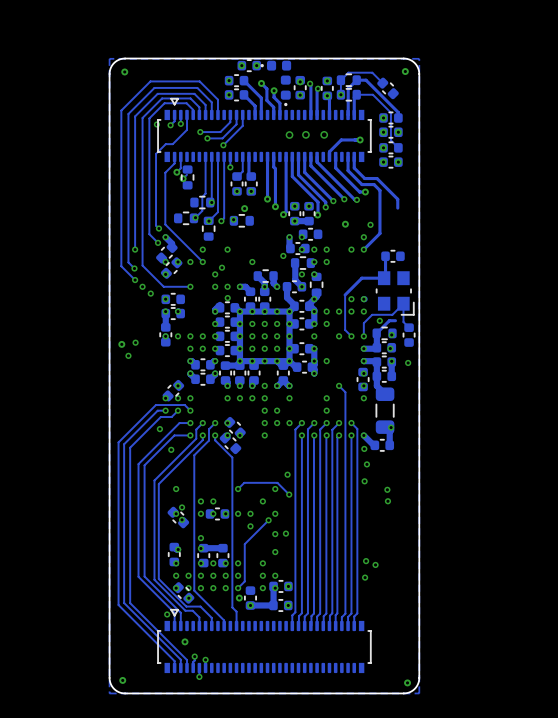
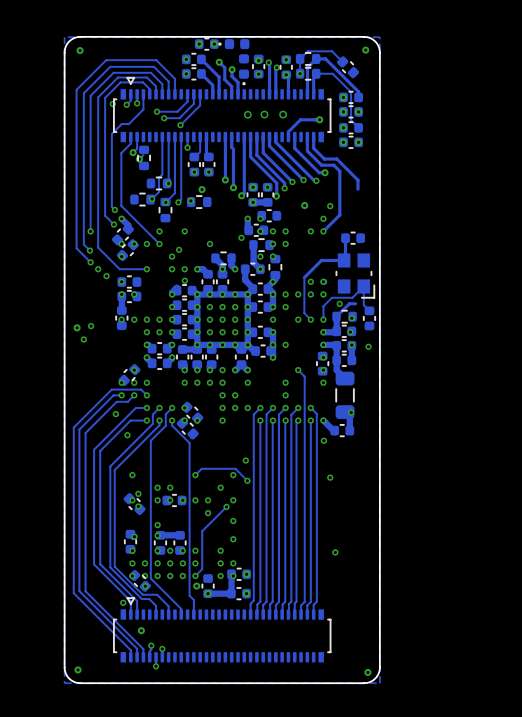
via: (364, 448) -> none
via: none -> (323, 440)
via: (366, 464) -> none
via: (364, 481) -> none
via: (387, 489) -> none
via: none -> (330, 477)
via: (387, 501) -> none
via: (285, 533) -> none
via: (366, 561) -> none
via: (365, 577) -> none

